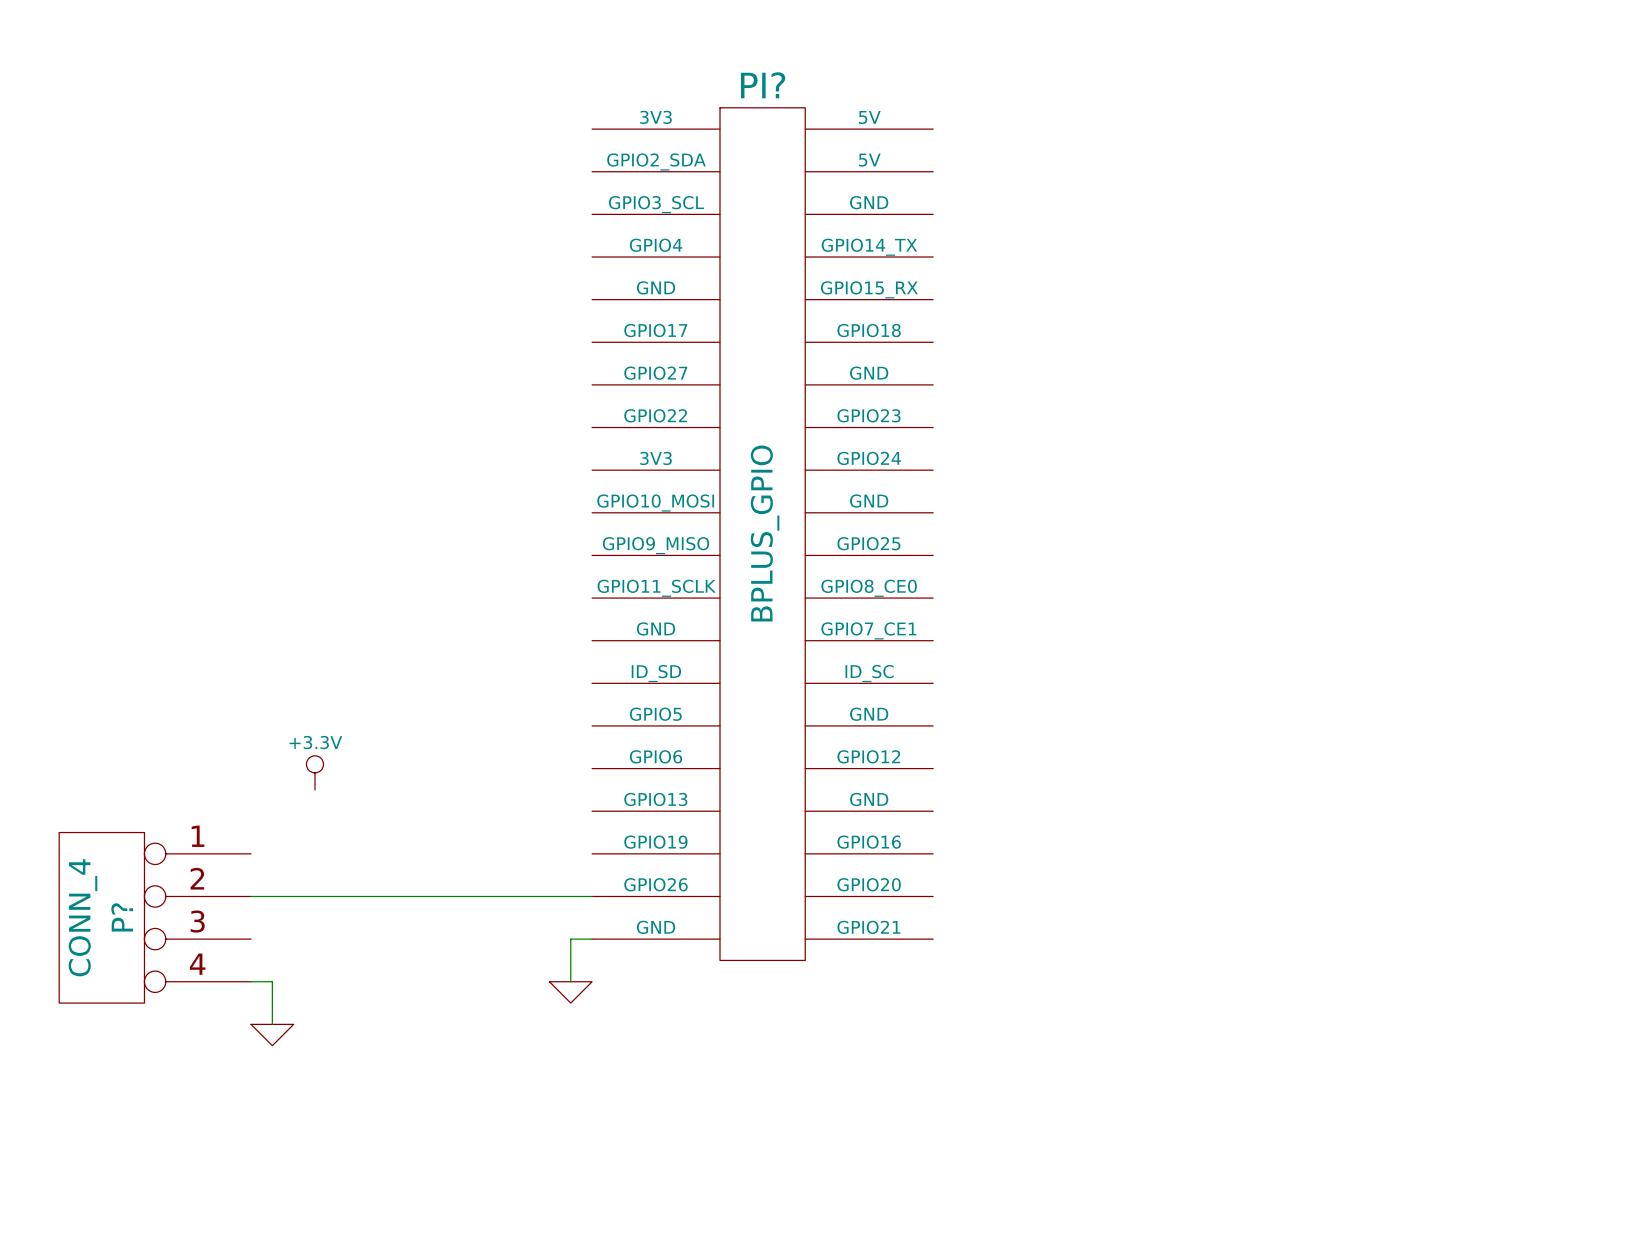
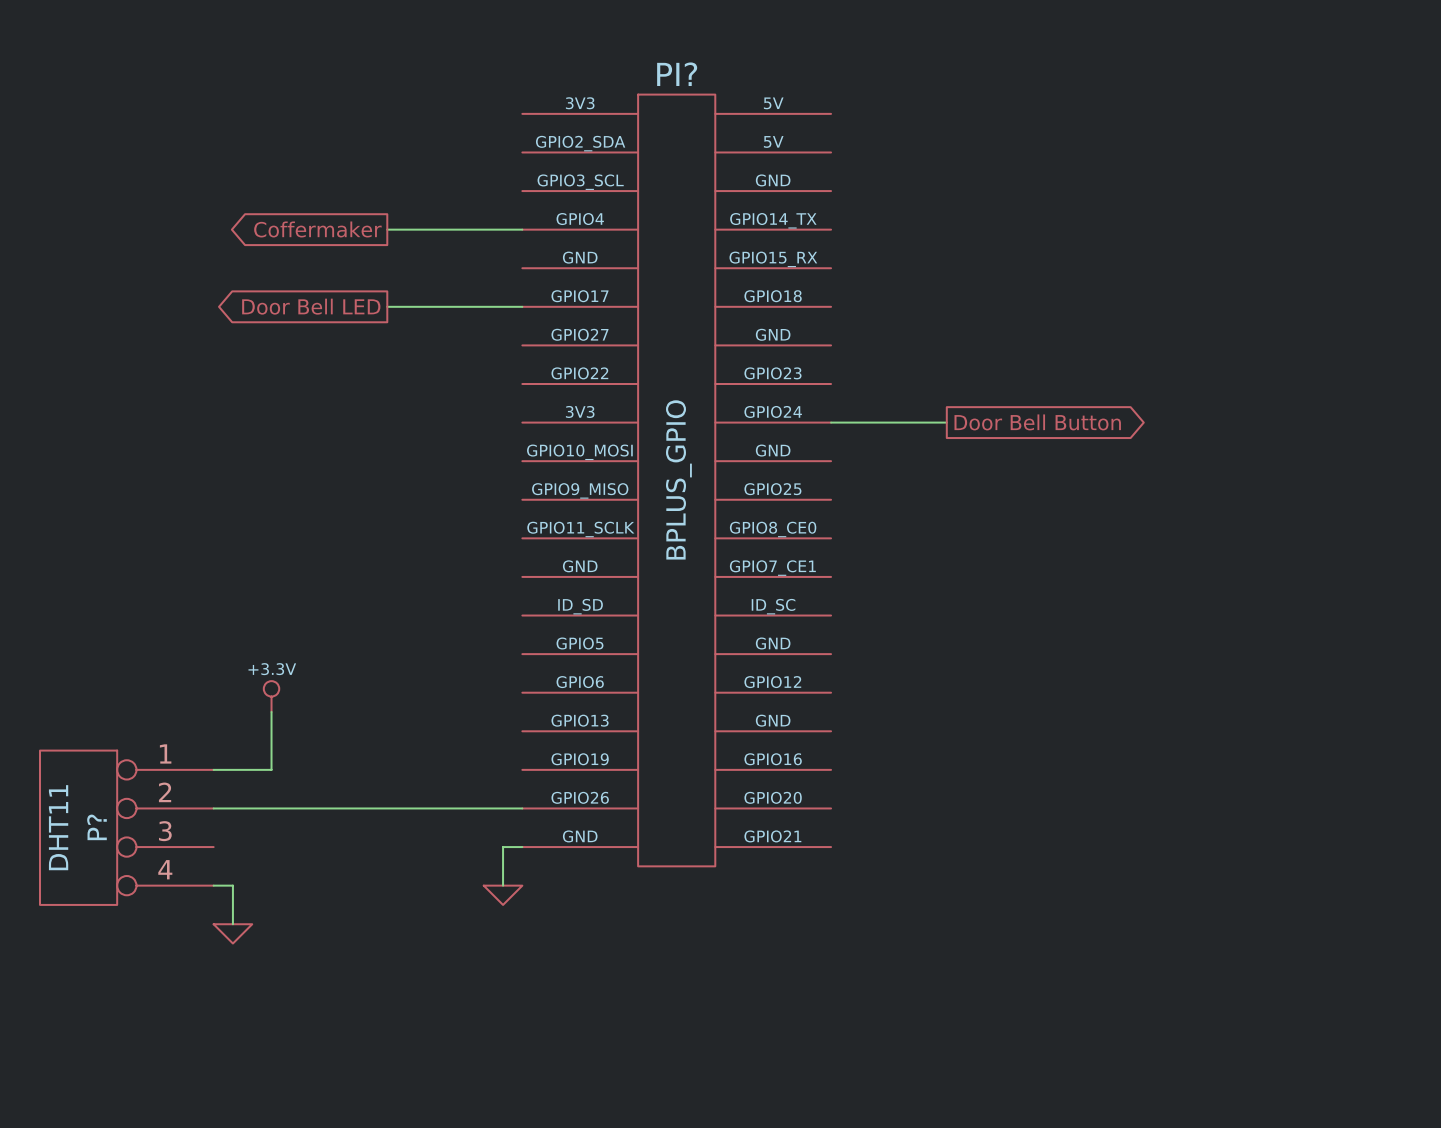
global label: none -> Coffermaker (317, 229)
wire: none -> (387, 229) (522, 229)
global label: none -> Door Bell LED (311, 306)
wire: none -> (387, 306) (522, 306)
global label: none -> Door Bell Button (1037, 422)
wire: none -> (831, 422) (946, 422)
wire: none -> (271, 711) (271, 769) (213, 769)
P? value: CONN_4 (82, 917) -> DHT11 (58, 827)

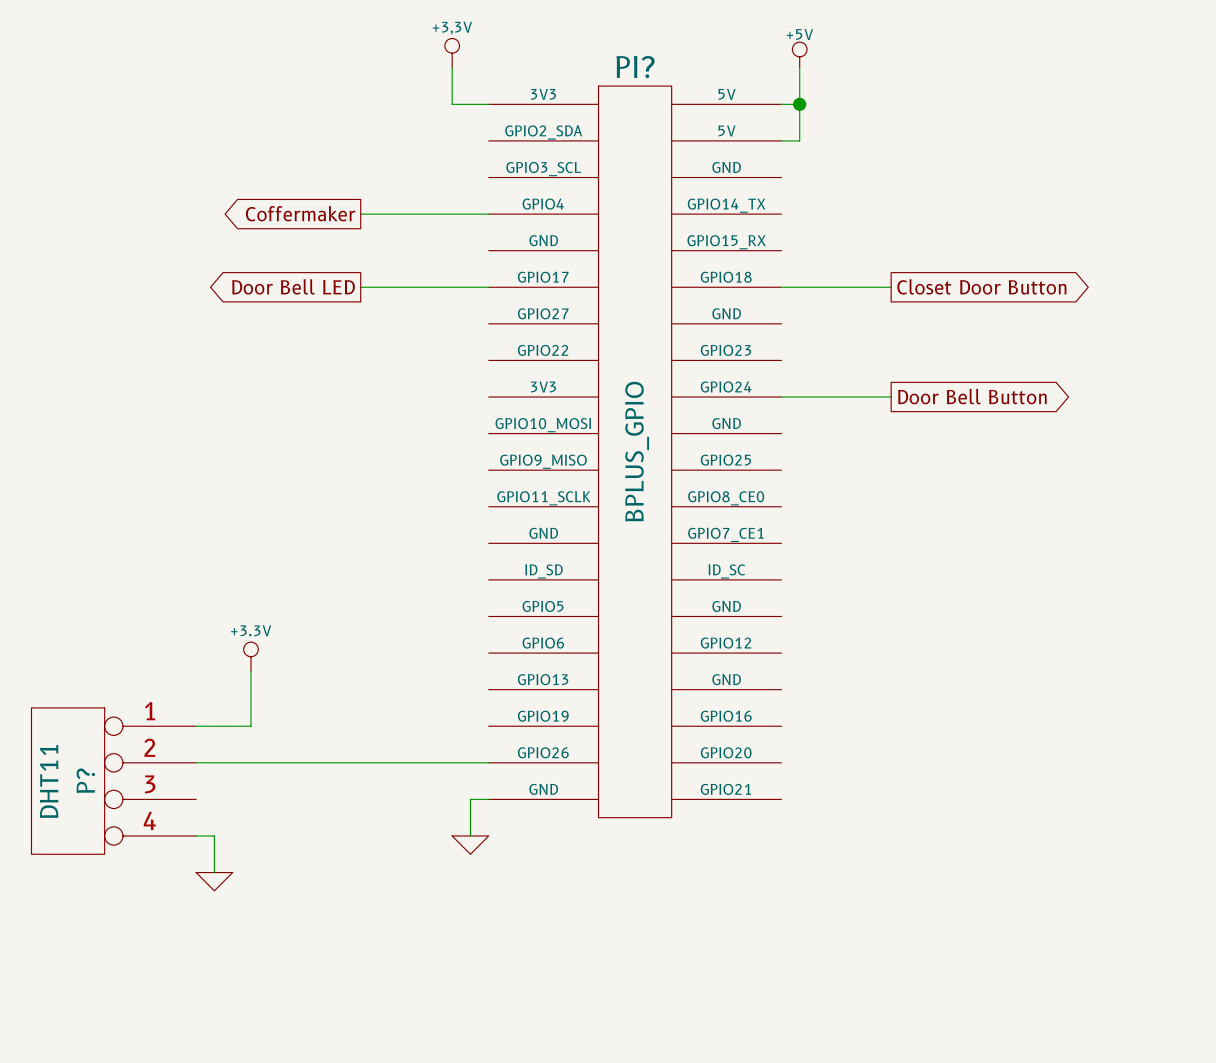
power symbol: none -> +3,3V (452, 53)
power symbol: none -> +5V (799, 54)
wire: none -> (452, 67) (452, 104) (488, 104)
wire: none -> (799, 67) (799, 140) (781, 140)
wire: none -> (781, 104) (799, 104)
junction: none -> (799, 104)
wire: none -> (781, 287) (891, 287)
global label: none -> Closet Door Button (981, 286)

